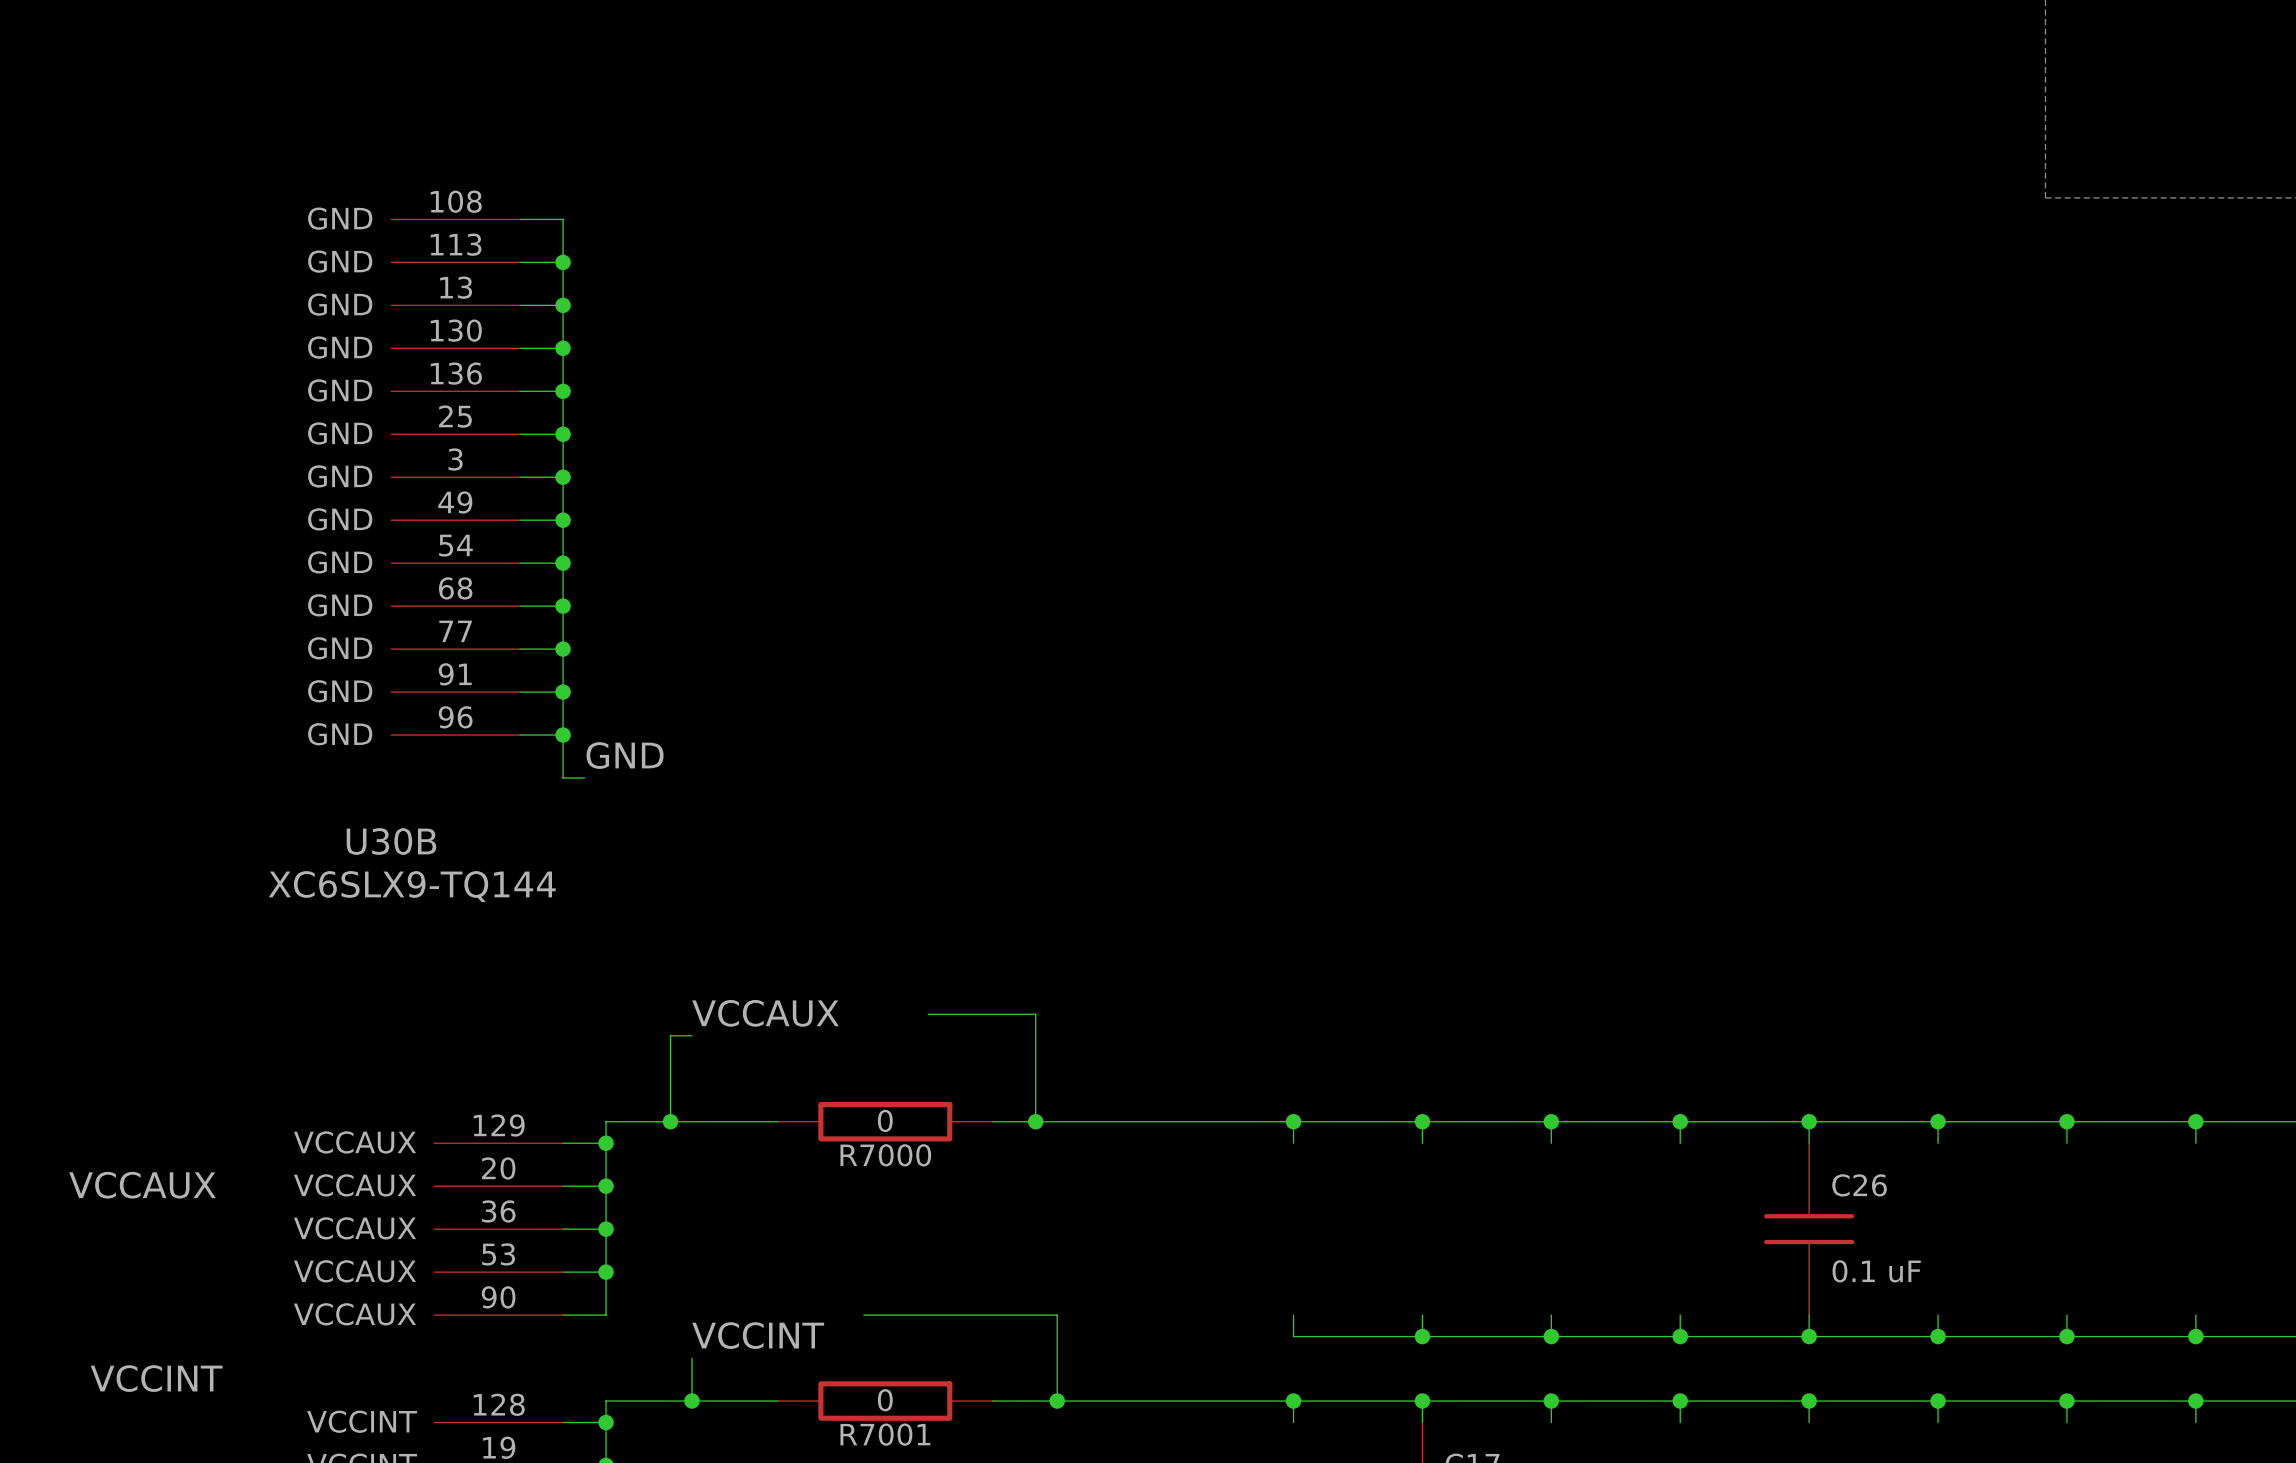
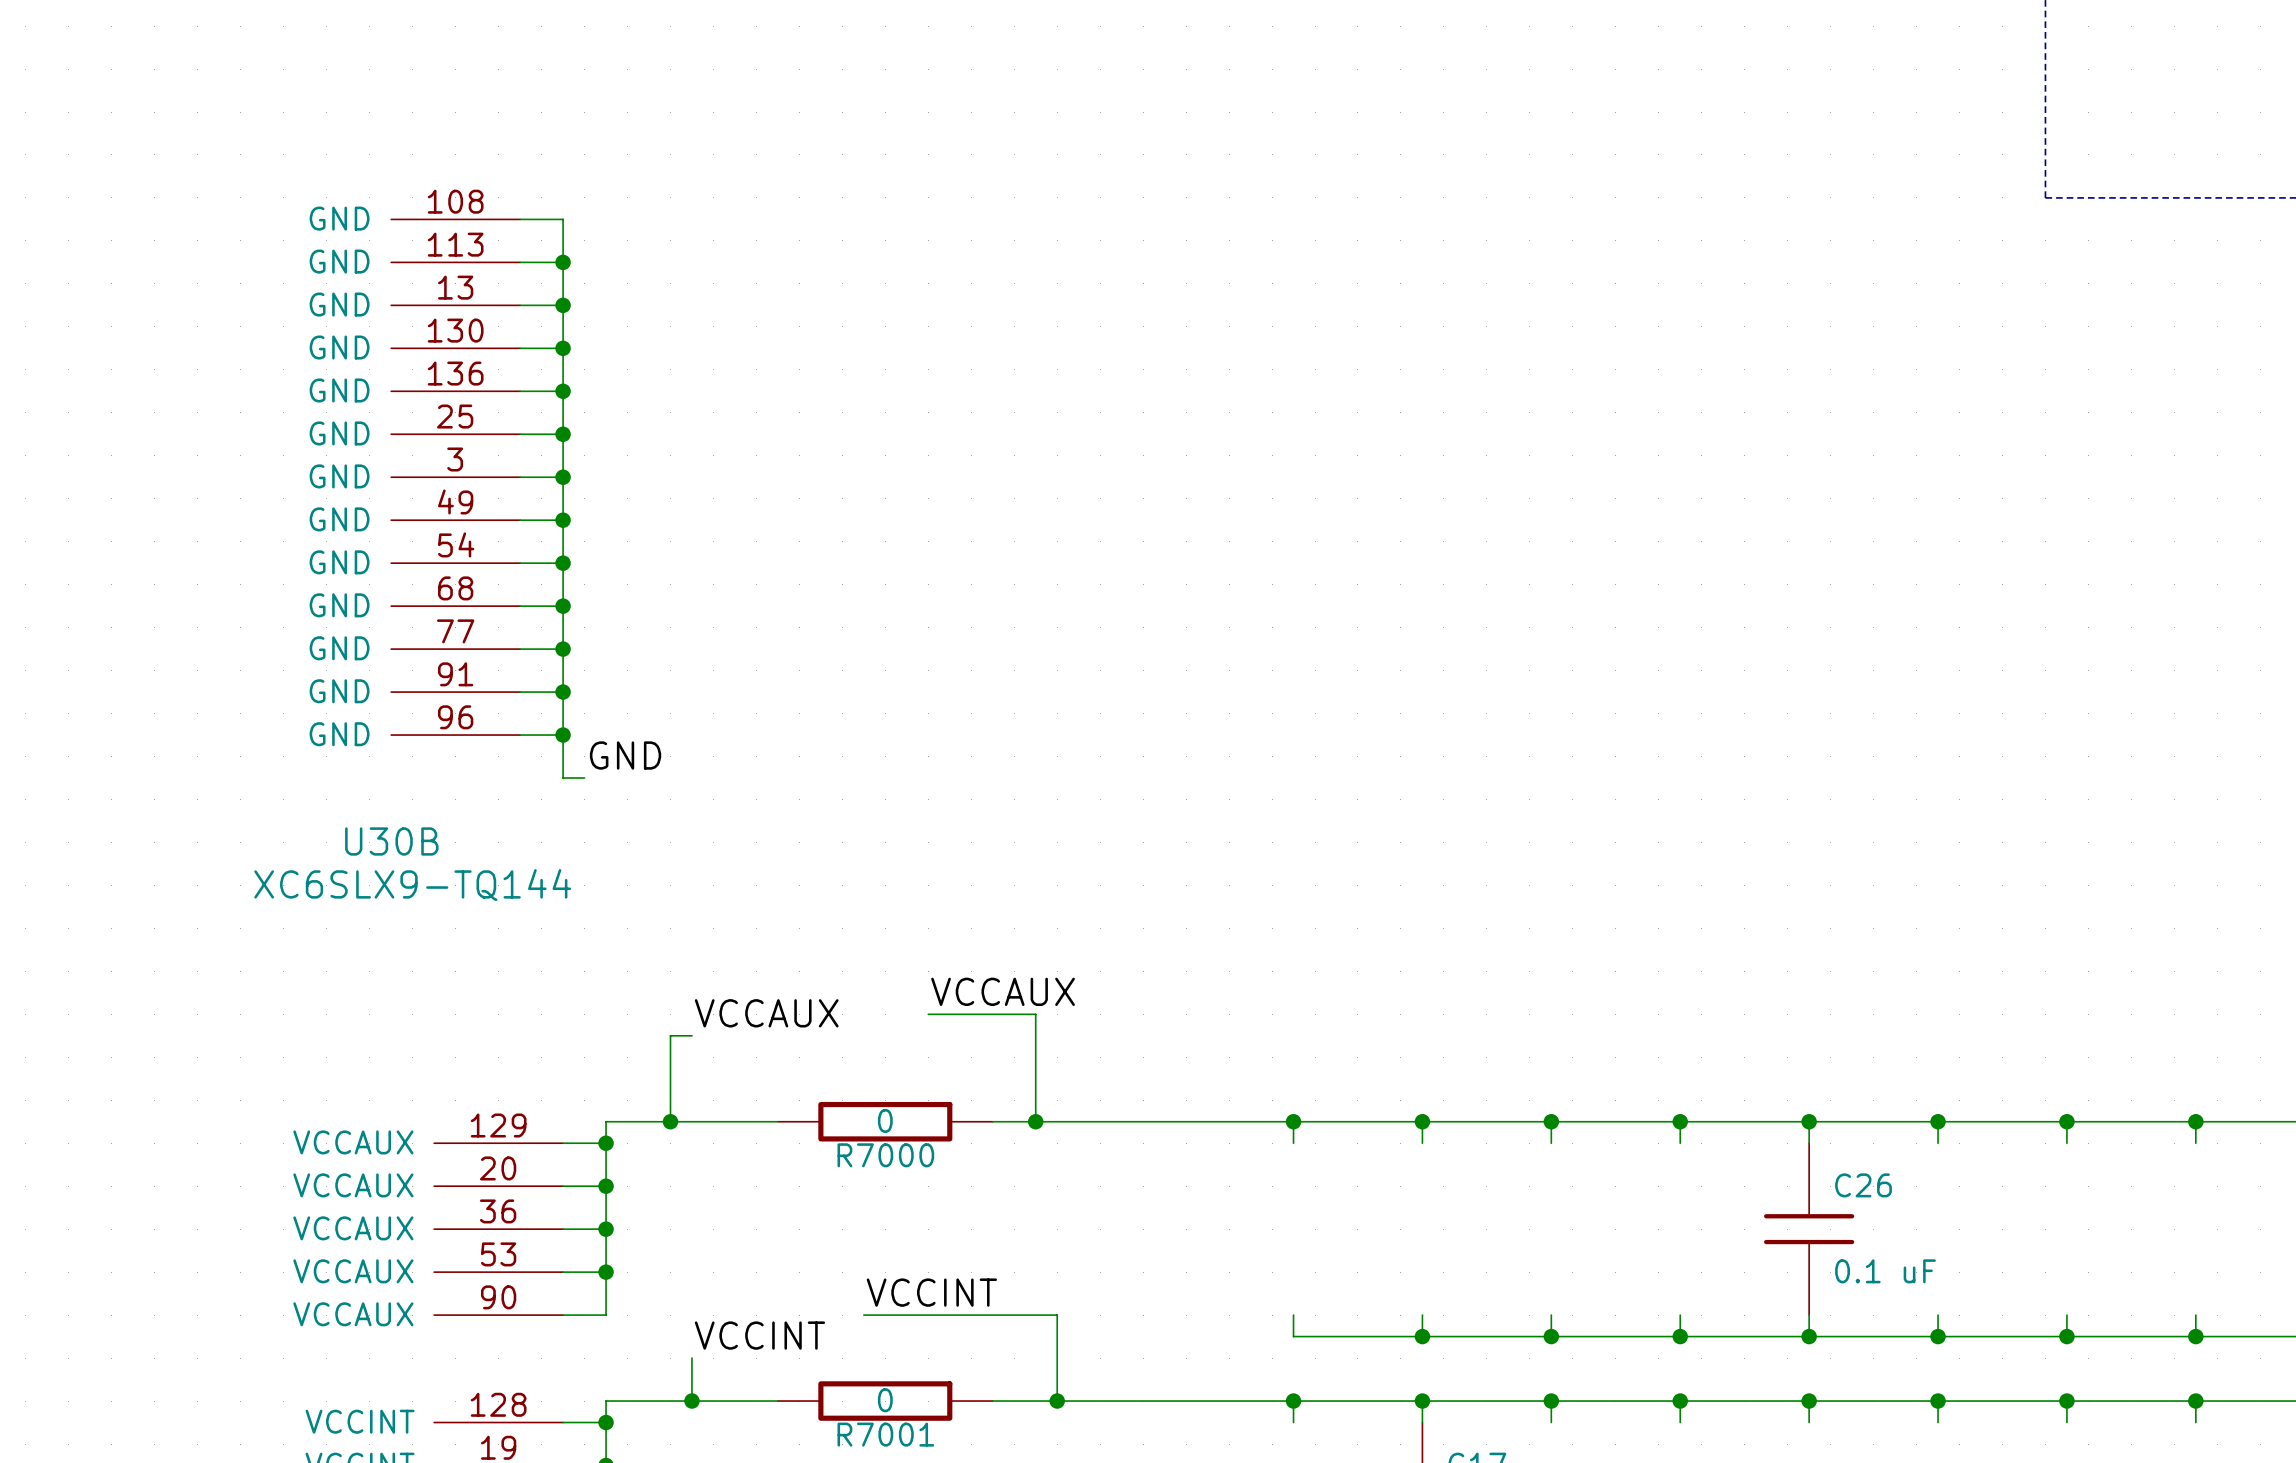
label: none -> VCCAUX (1003, 991)
label: VCCAUX (142, 1185) -> none
label: none -> VCCINT (931, 1292)
label: VCCINT (156, 1378) -> none

